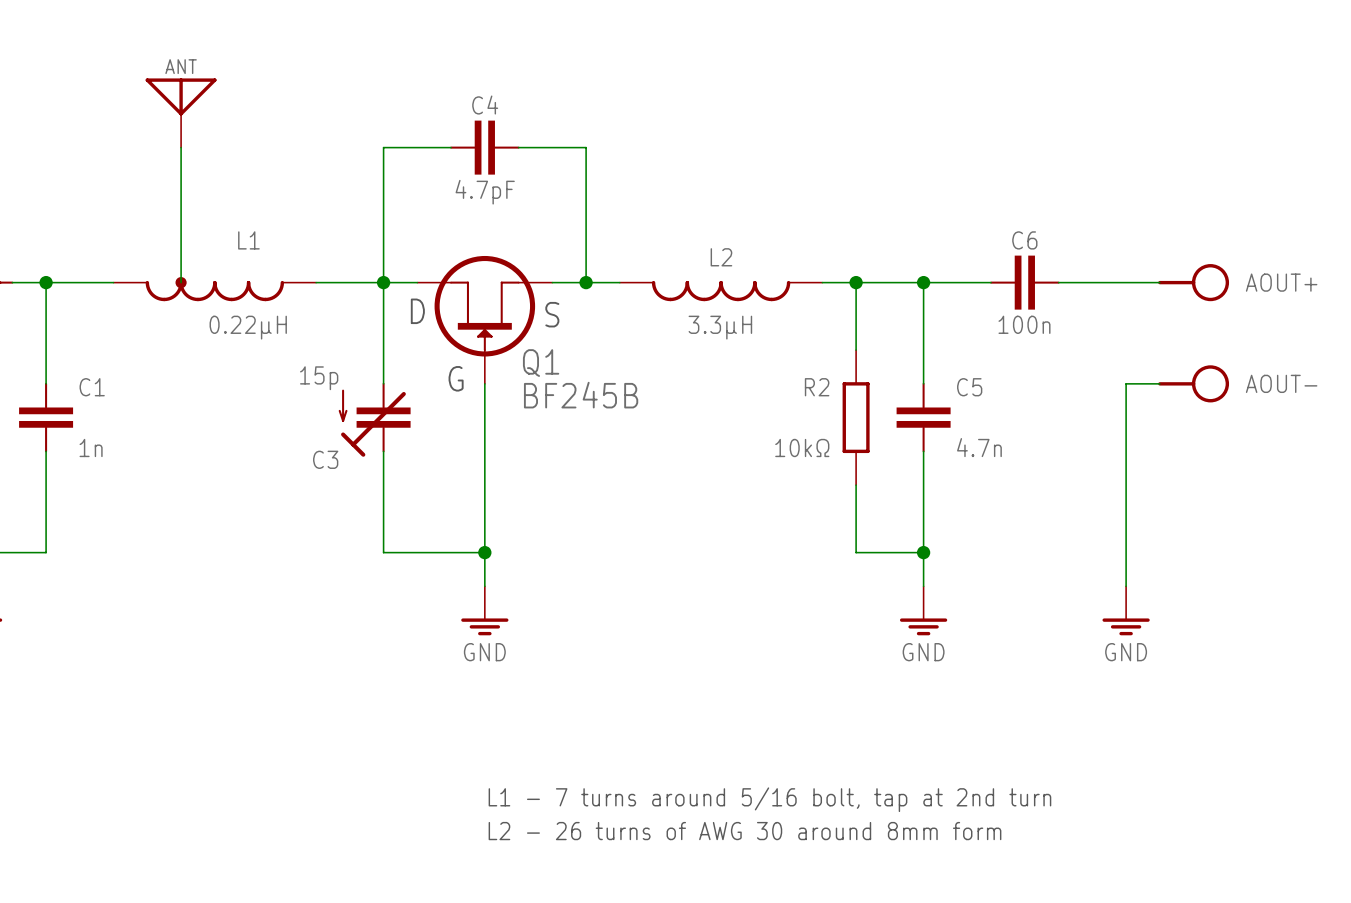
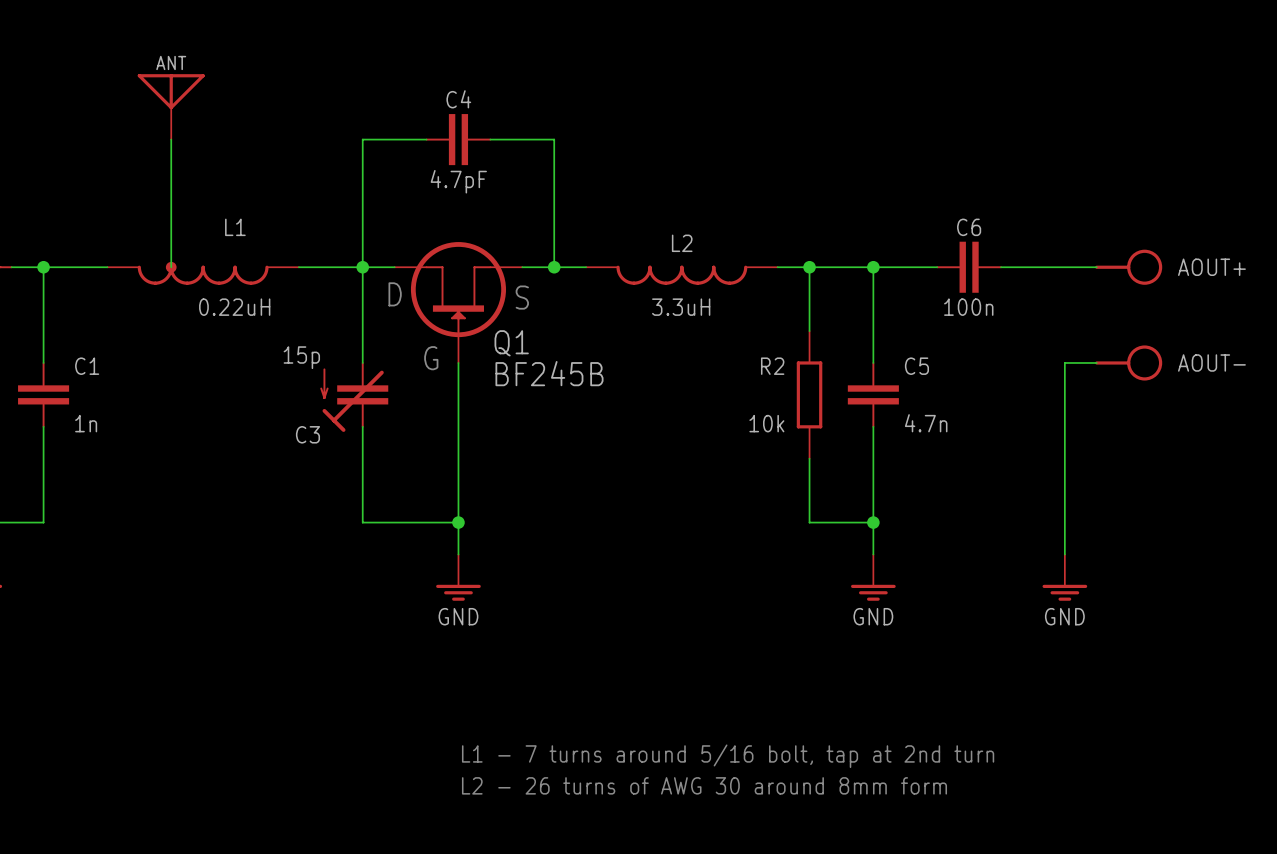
L1 value: 0.22μH (248, 327) -> 0.22uH (234, 307)
L2 value: 3.3μH (720, 327) -> 3.3uH (681, 307)
R2 value: 10kΩ (802, 447) -> 10k (766, 423)

